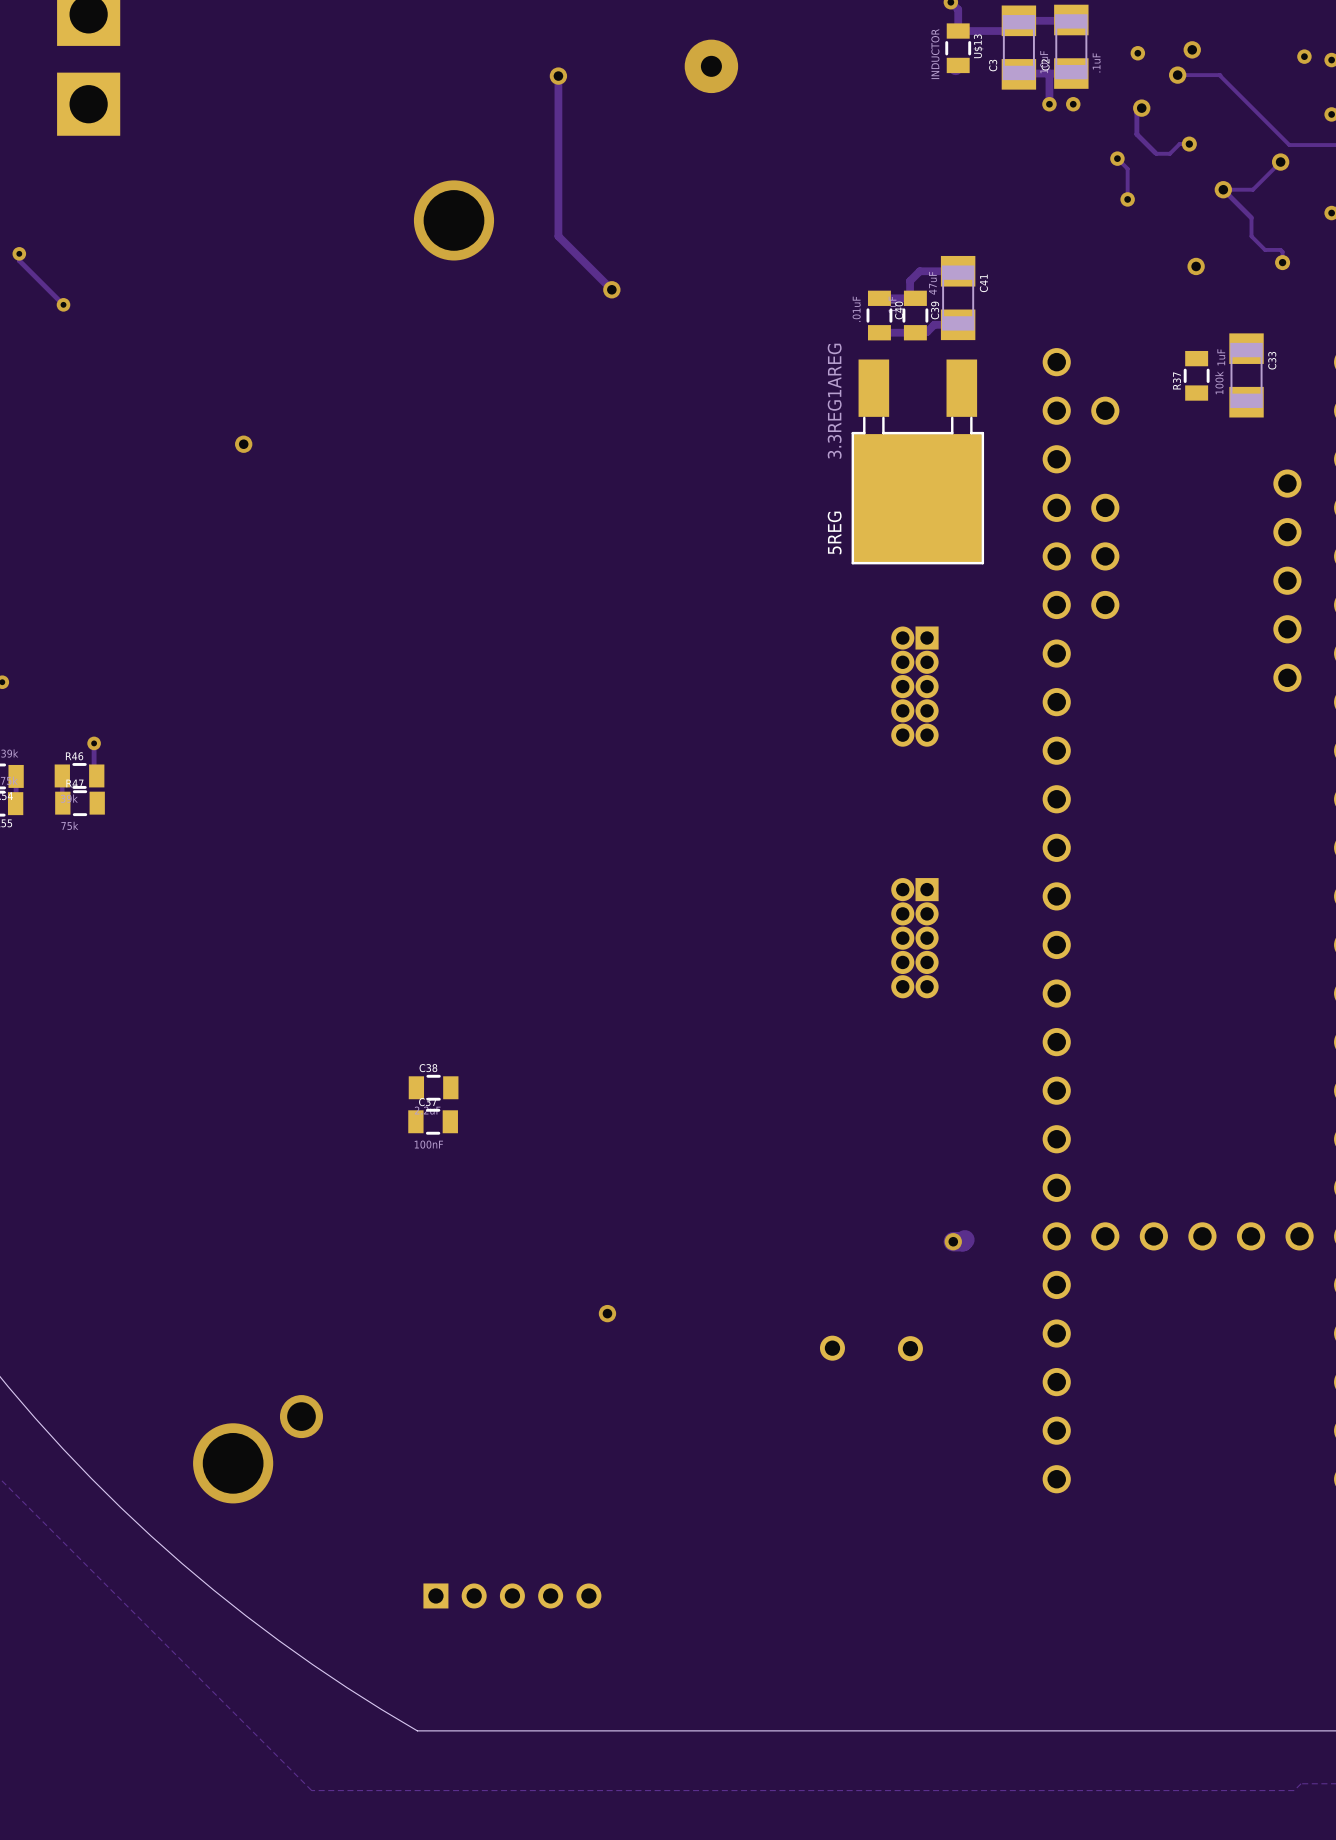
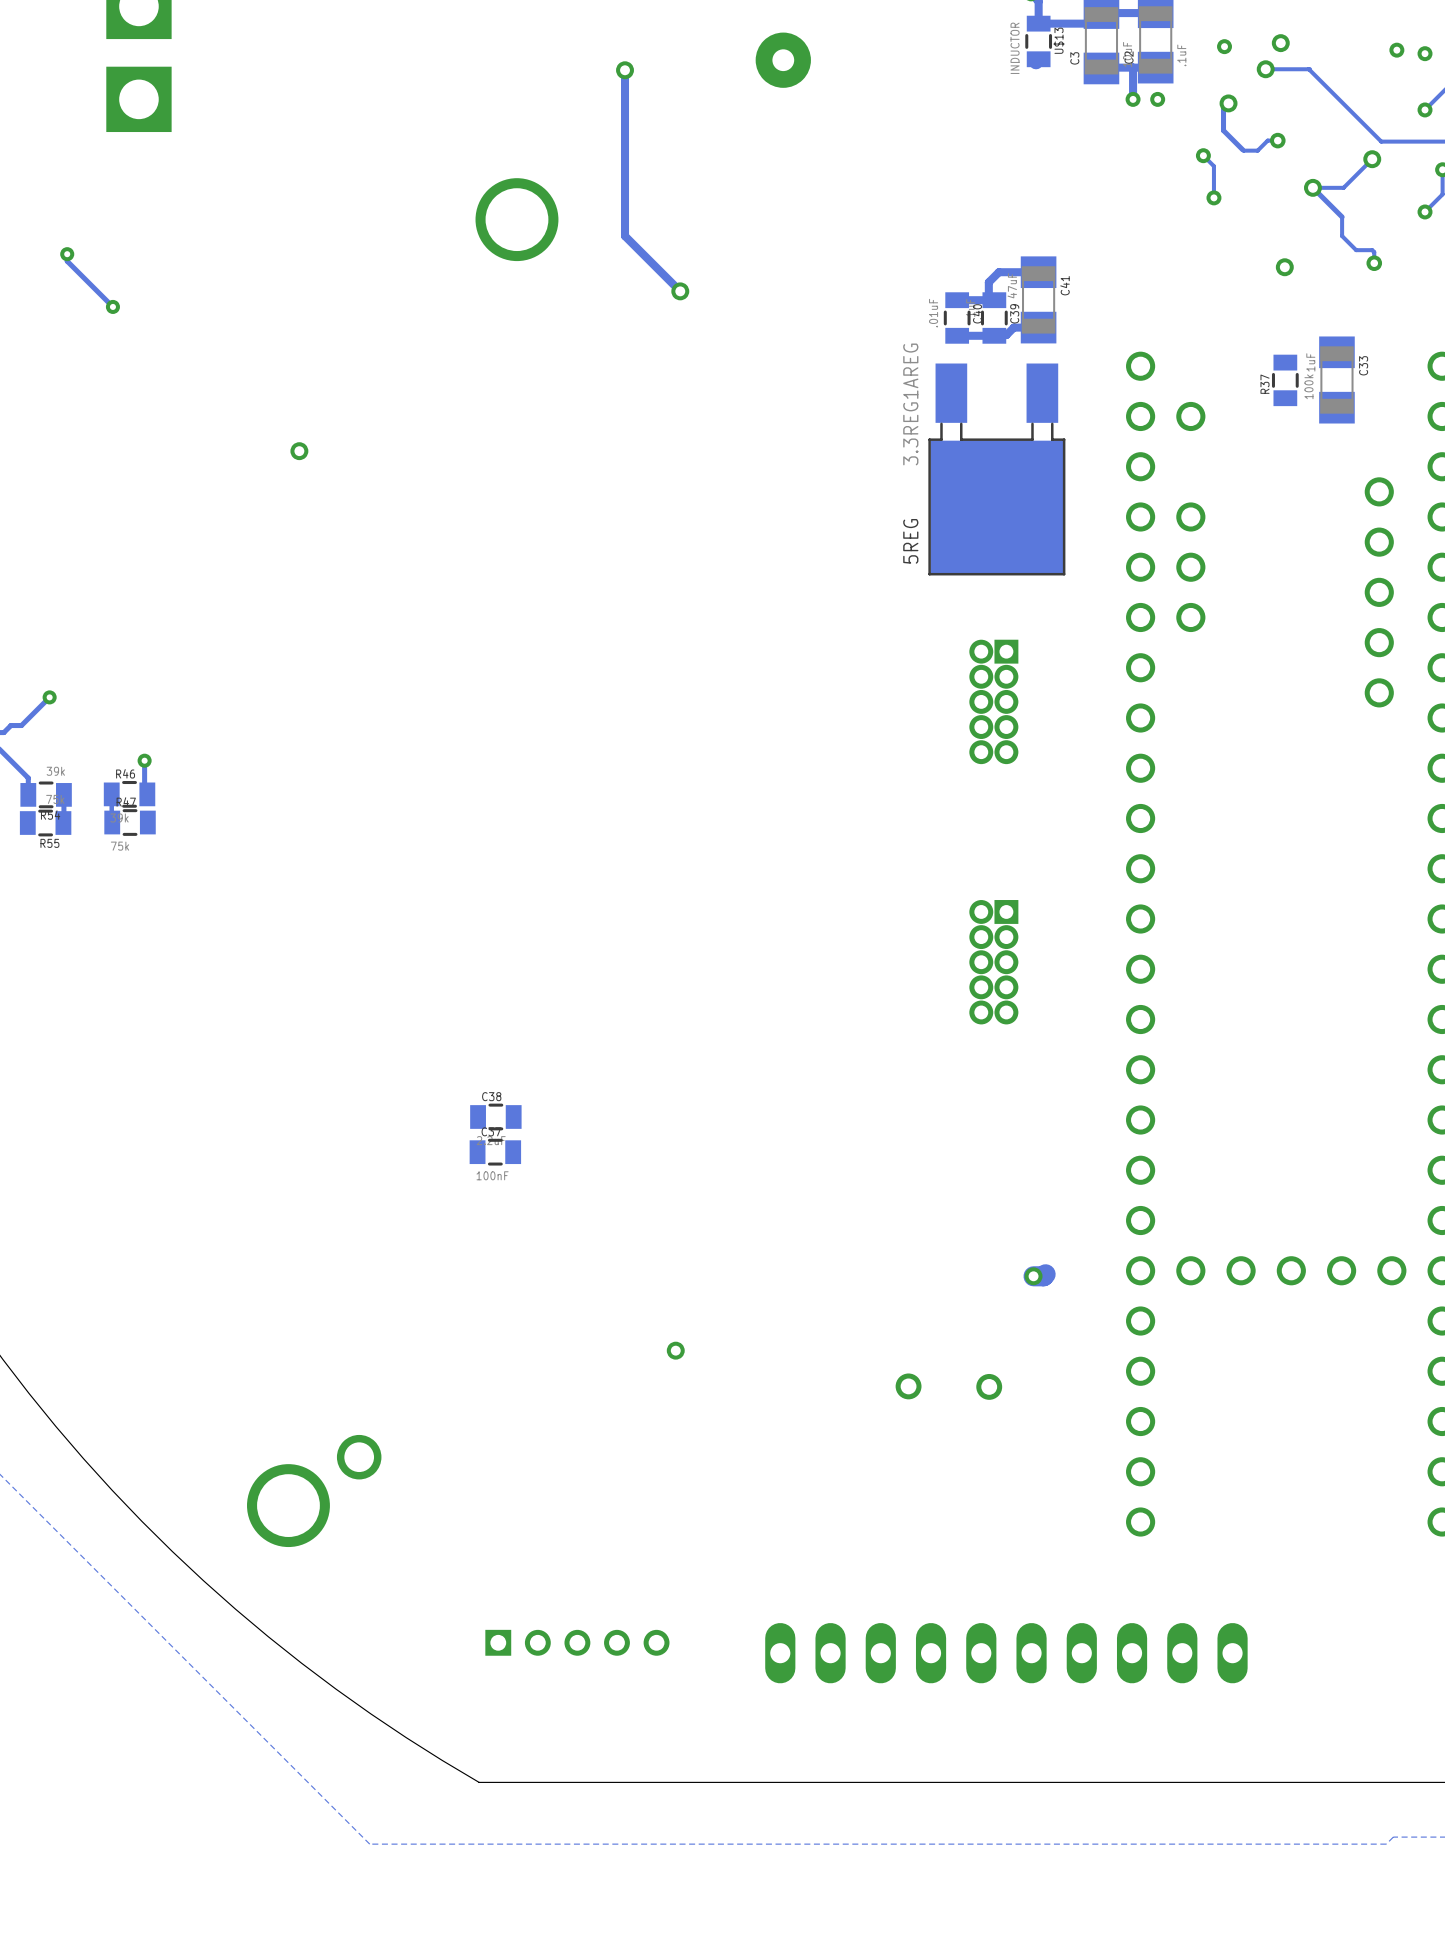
part: none -> (1006, 1653)

